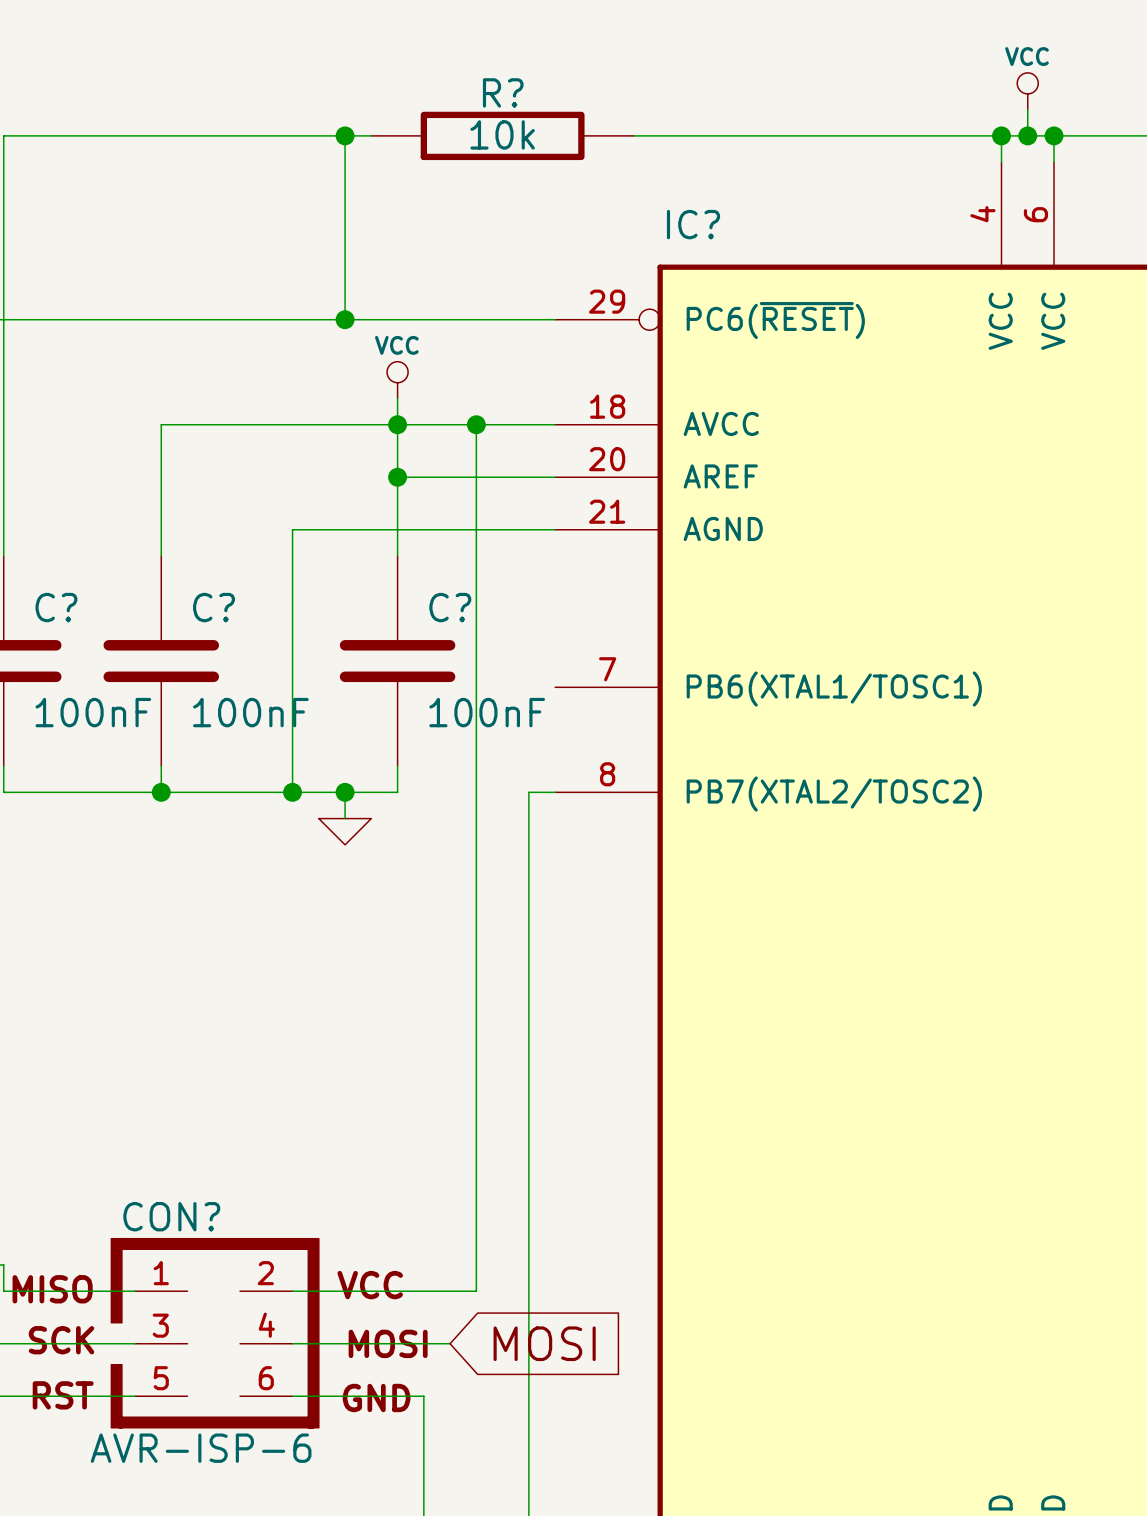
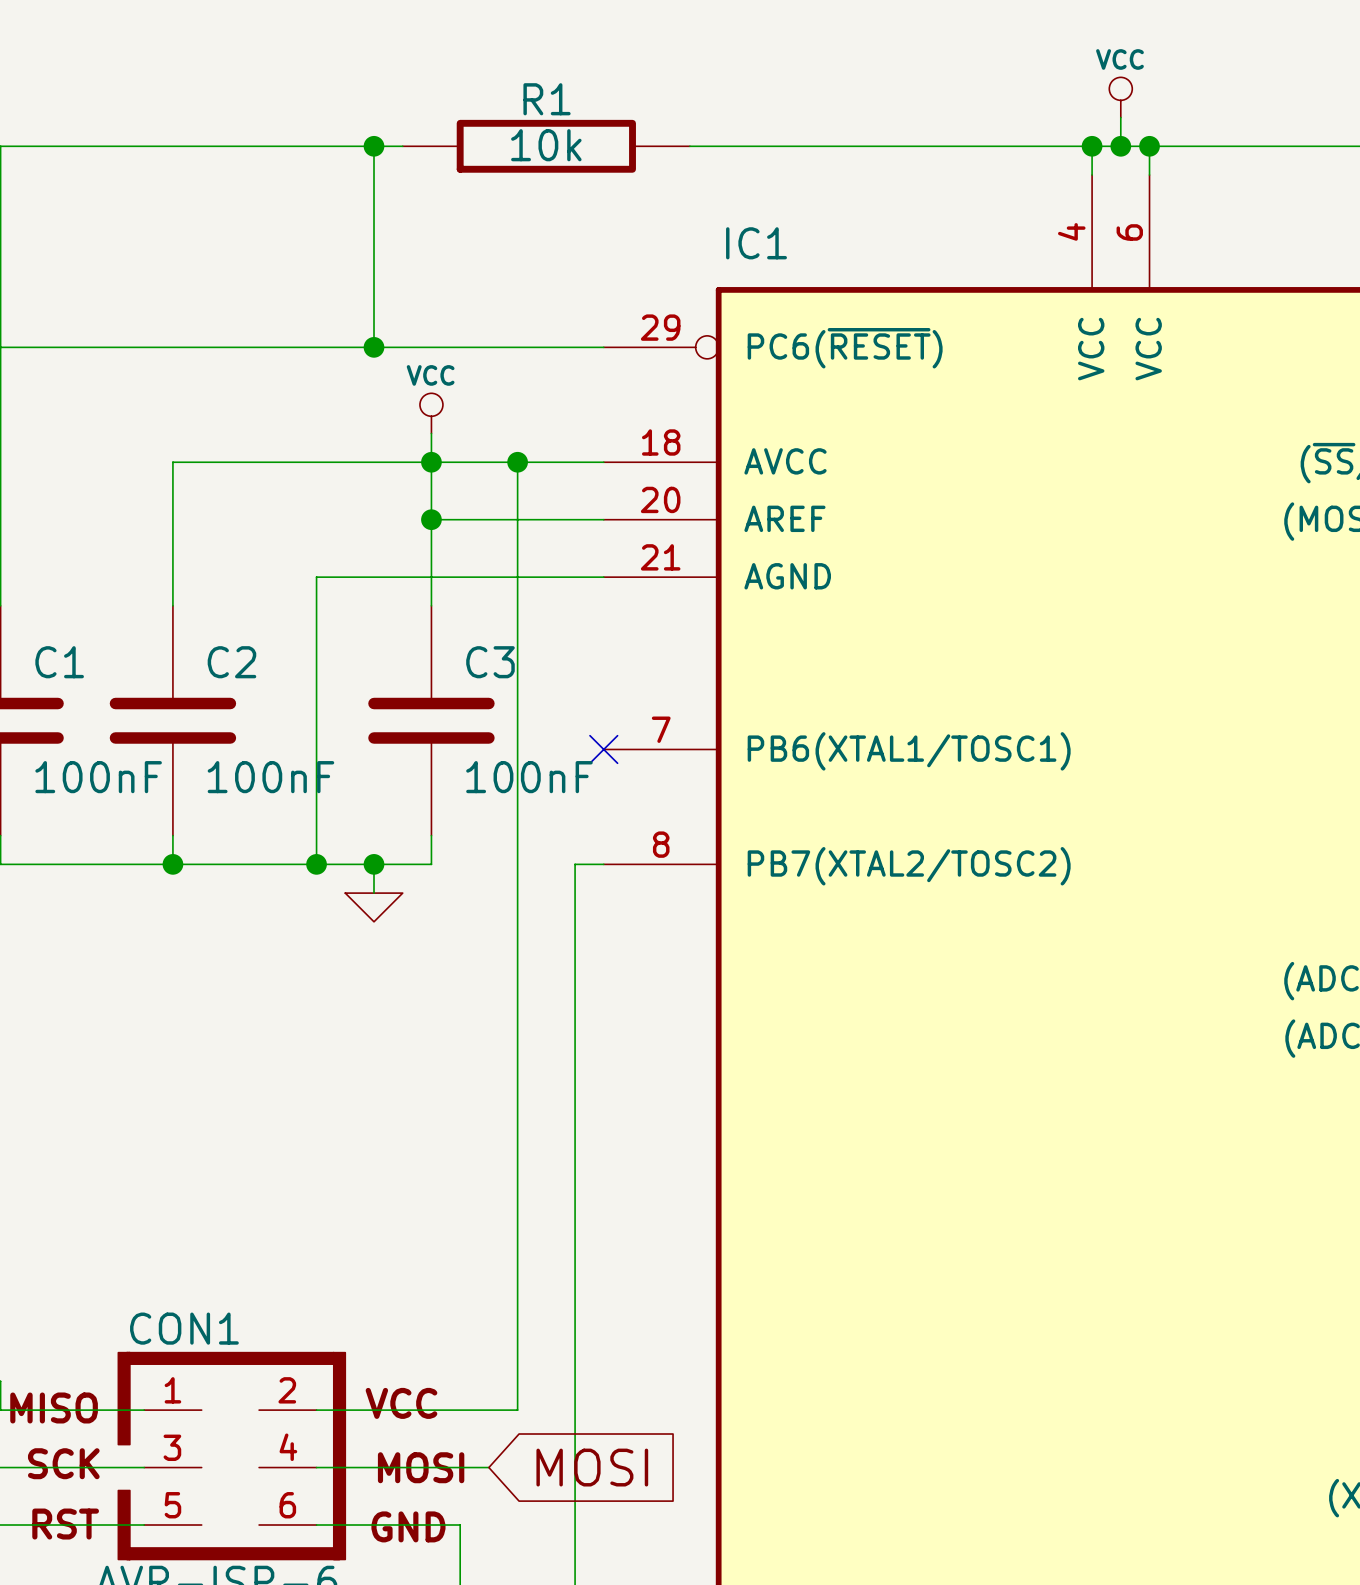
R? name: R? (503, 92) -> R1 (547, 99)
IC? name: IC? (693, 224) -> IC1 (756, 243)
C? name: C? (56, 607) -> C1 (59, 662)
C? name: C? (213, 607) -> C2 (231, 662)
C? name: C? (450, 607) -> C3 (490, 662)
no-connect mark: none -> (603, 749)
CON? name: CON? (171, 1216) -> CON1 (184, 1328)

